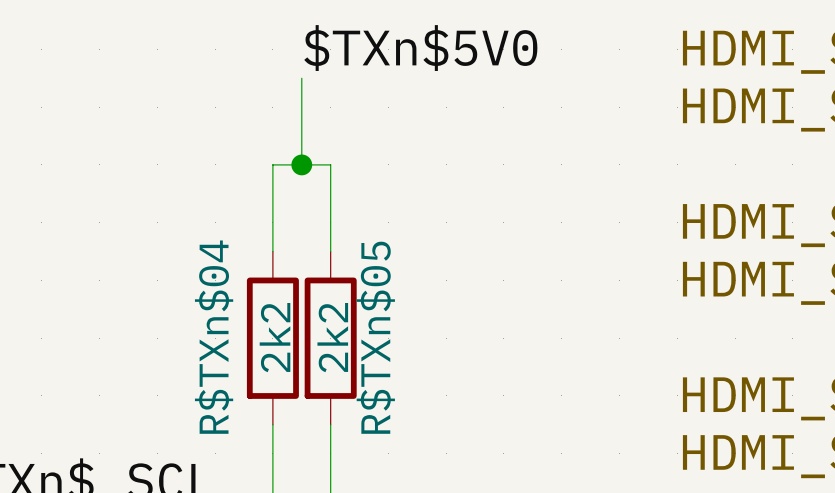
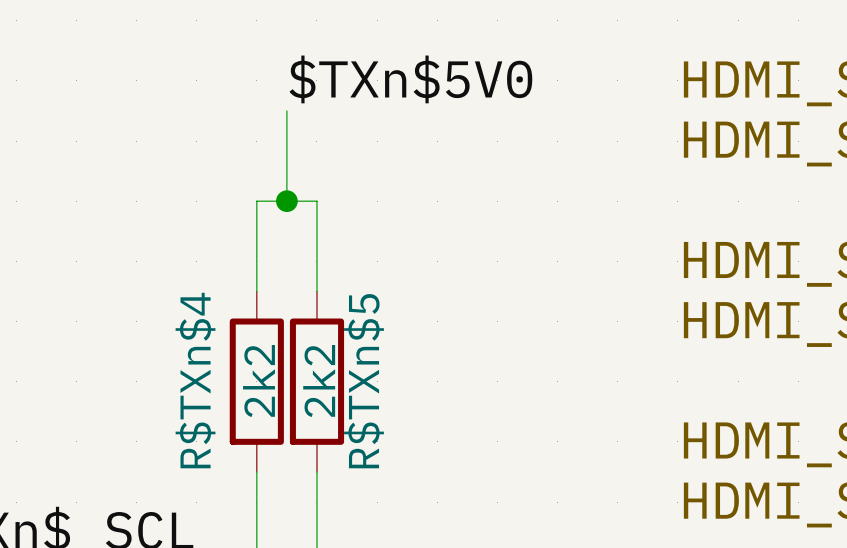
R$TXn$04 name: R$TXn$04 (214, 337) -> R$TXn$4 (195, 380)
R$TXn$05 name: R$TXn$05 (375, 337) -> R$TXn$5 (364, 381)

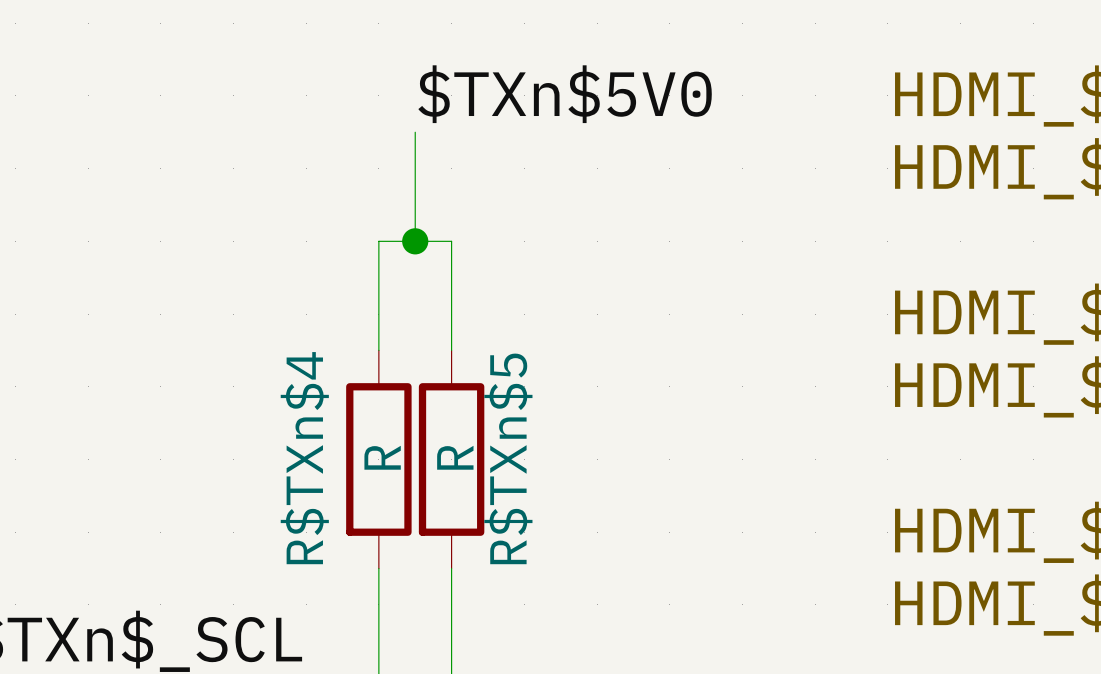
R$TXn$4 value: 2k2 (259, 381) -> R (382, 457)
R$TXn$5 value: 2k2 (319, 381) -> R (455, 457)

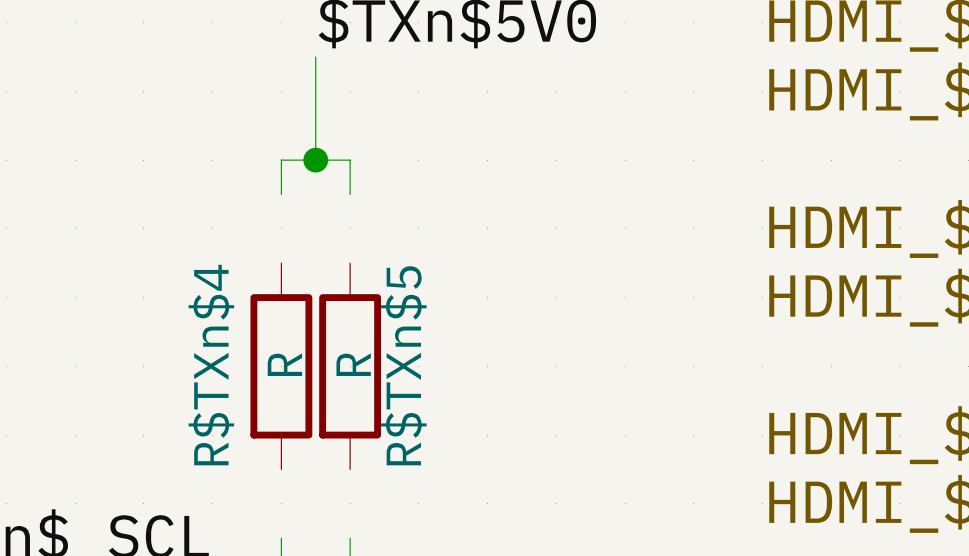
wire: (378, 277) (378, 350) -> none
wire: (451, 277) (451, 350) -> none
wire: (378, 568) (378, 641) -> none
wire: (451, 568) (451, 641) -> none

